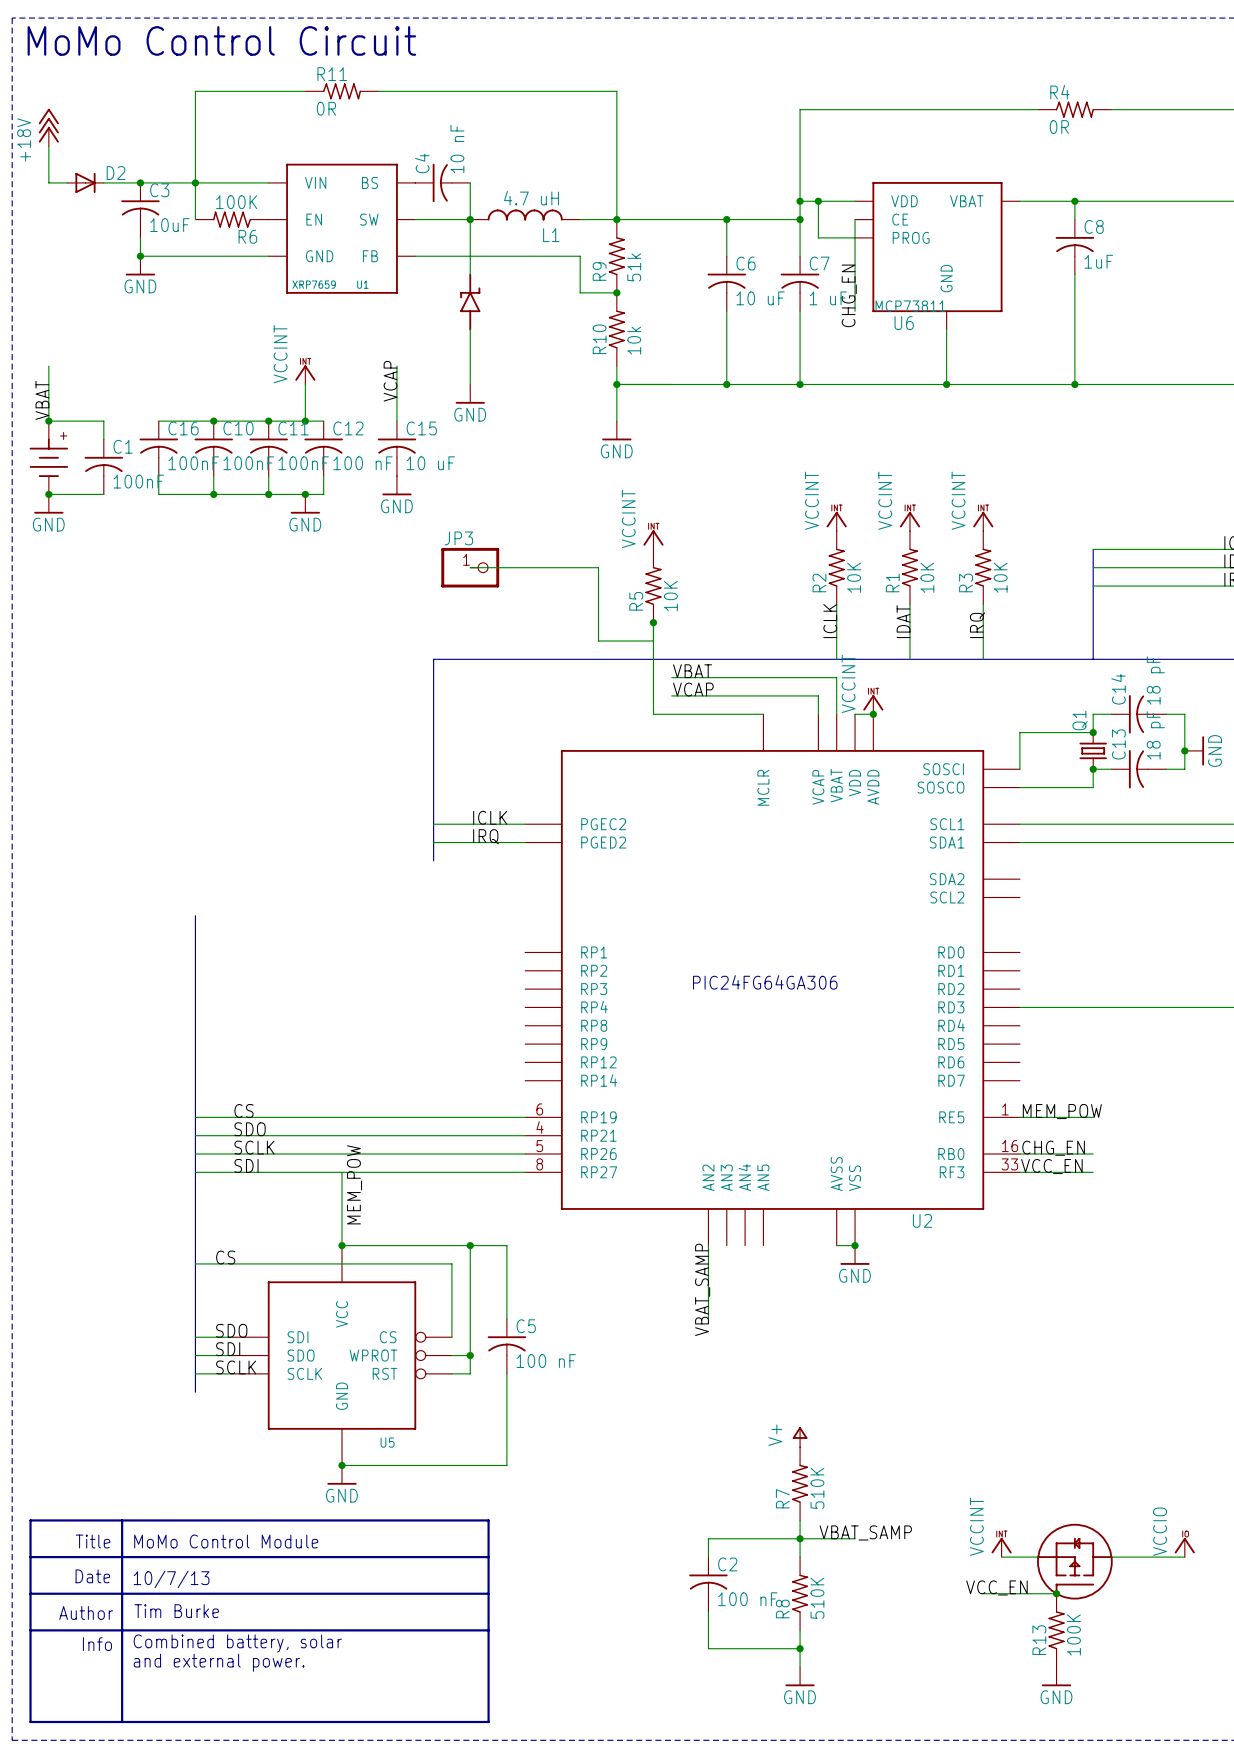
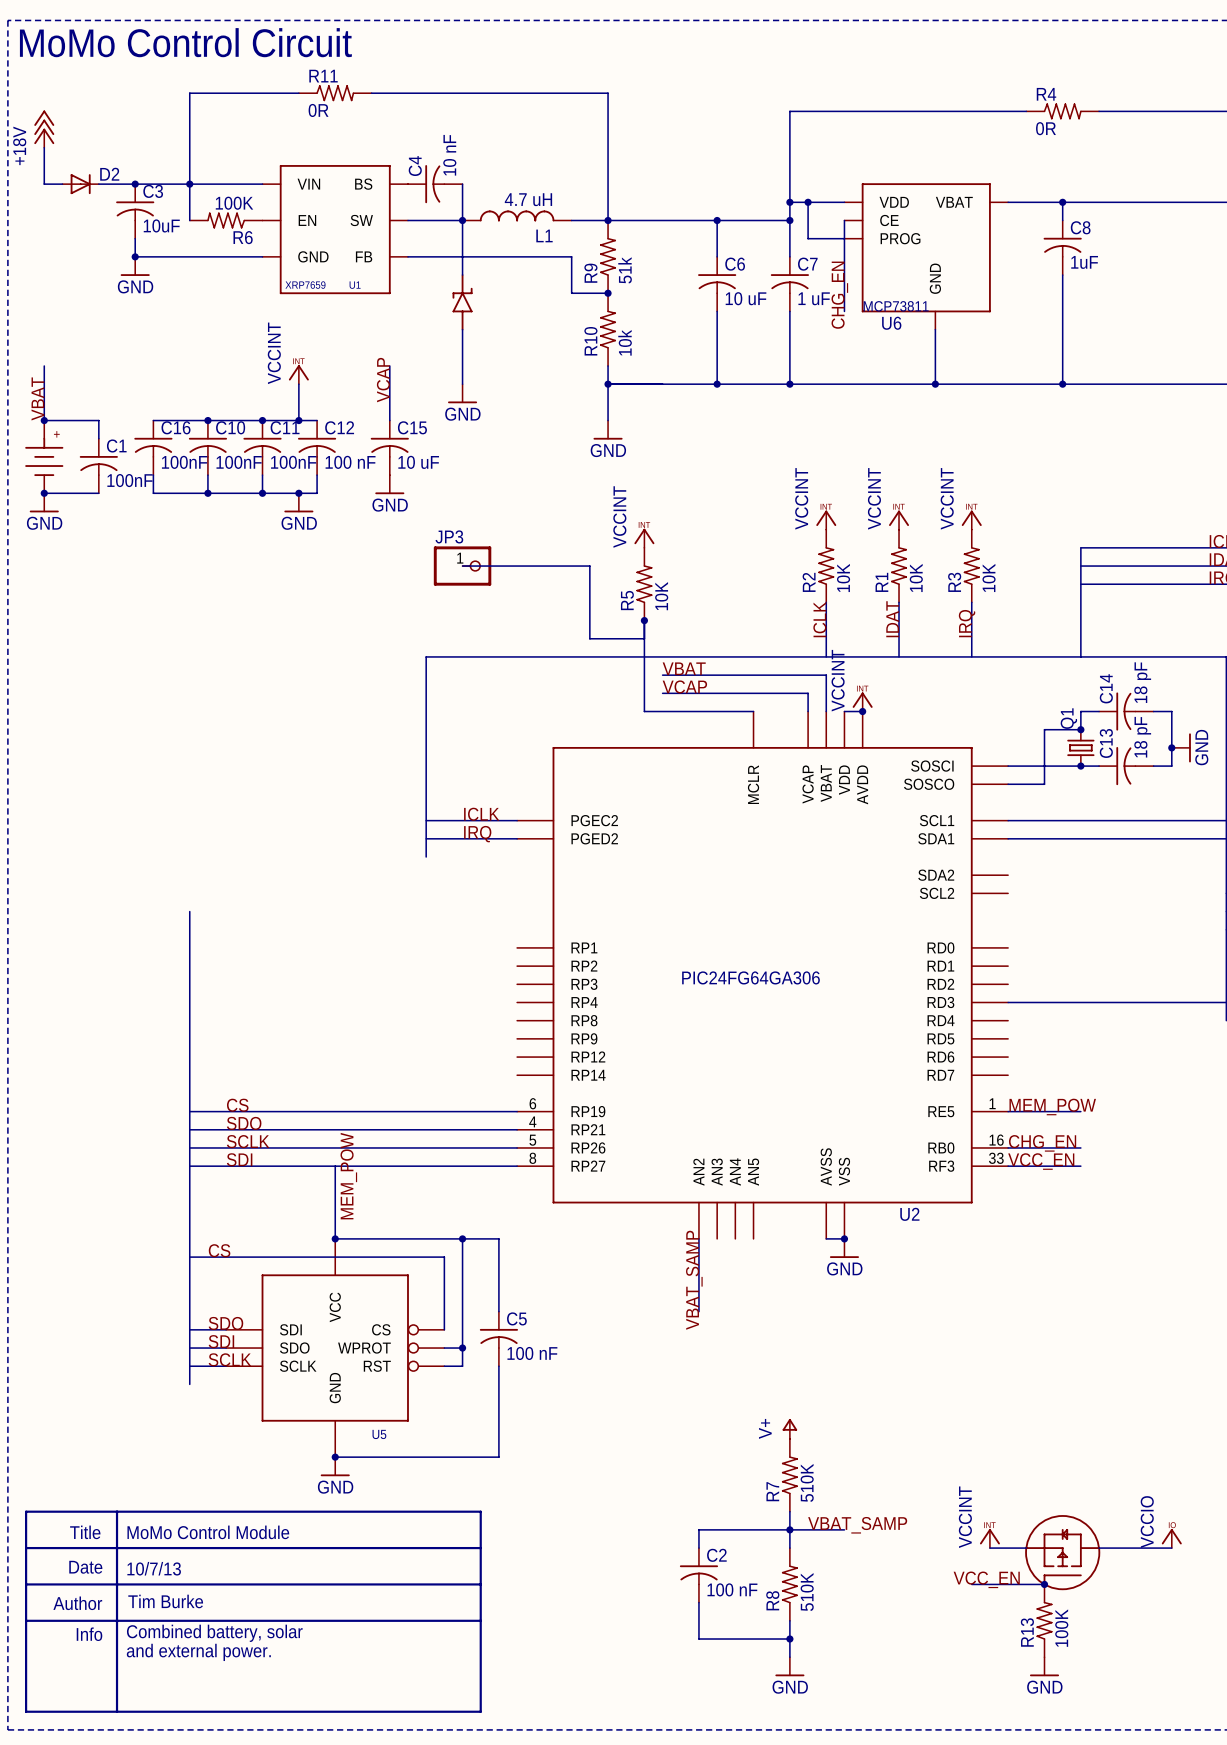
wire: (1056, 732) (1019, 732) (1019, 769) -> (1044, 729) (1044, 784)
wire: (1093, 769) (1093, 787) (1056, 787) -> (1080, 766) (1008, 766)

